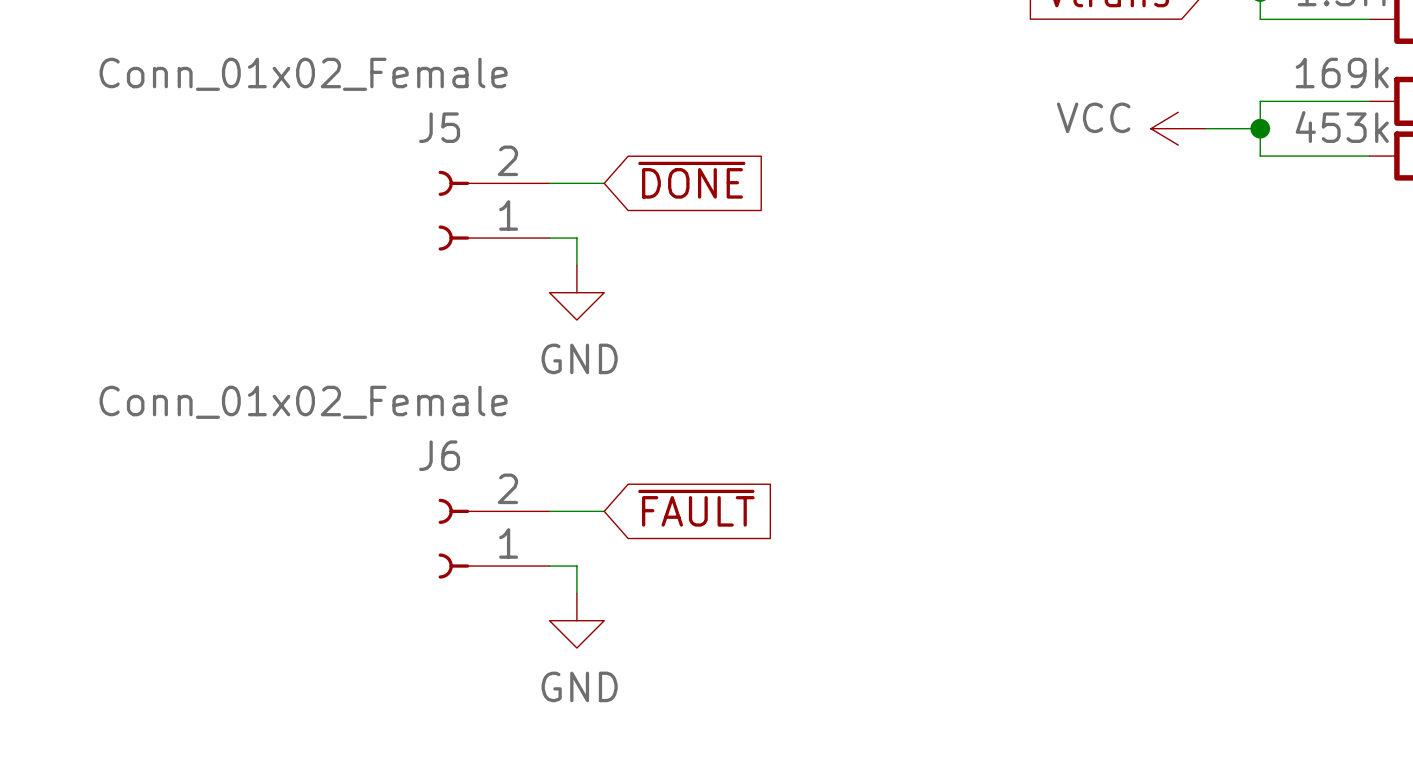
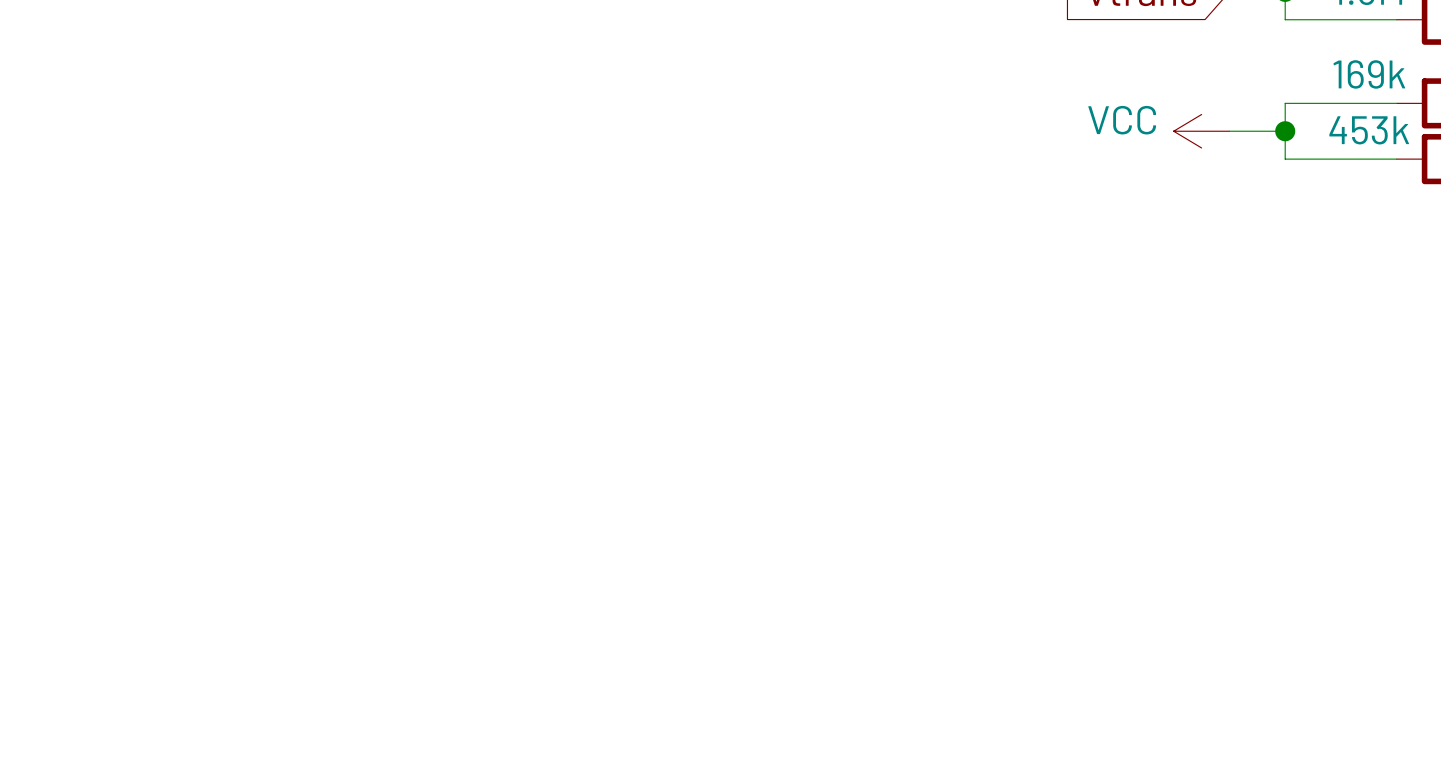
global label: ~{DONE} (691, 180) -> none
wire: (549, 183) (604, 183) -> none
J5: Conn_01x02_Female (494, 210) -> none
wire: (549, 238) (576, 238) (576, 265) -> none
power symbol: GND (576, 292) -> none
global label: ~{FAULT} (696, 508) -> none
wire: (549, 511) (604, 511) -> none
J6: Conn_01x02_Female (494, 538) -> none
wire: (549, 566) (576, 566) (576, 593) -> none
power symbol: GND (576, 620) -> none

